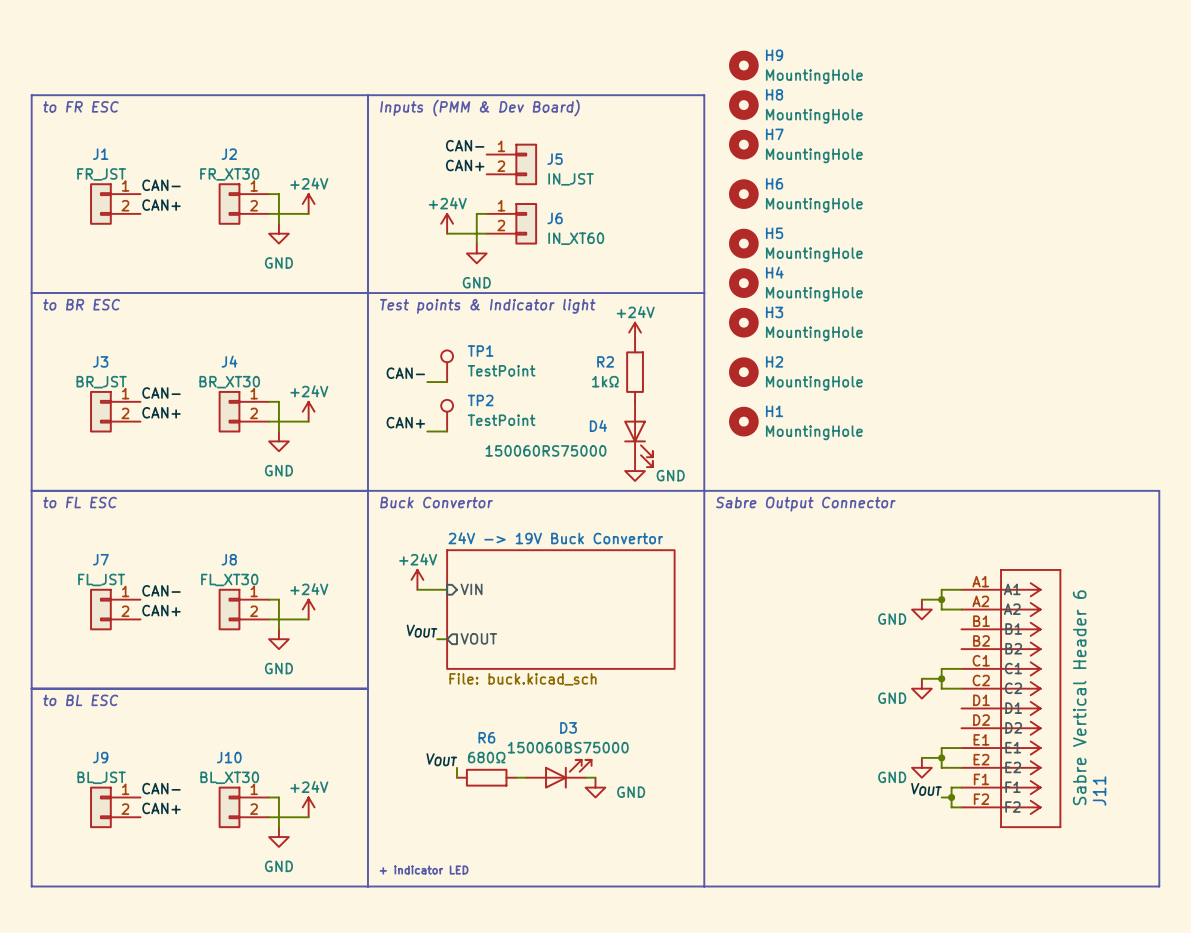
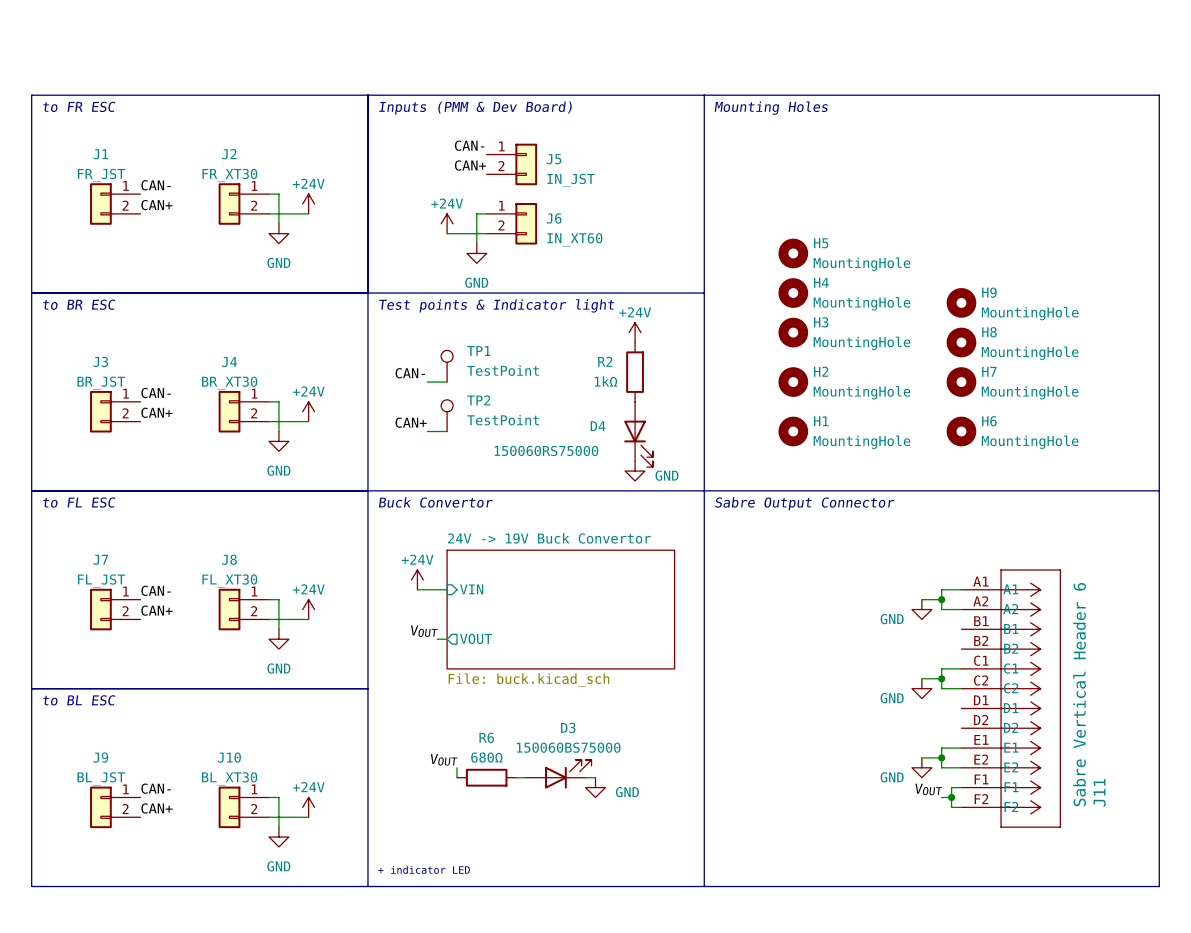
H9 position: (743, 65) -> (961, 302)
line: none -> (704, 95) (1159, 95) (1159, 490)
H8 position: (743, 105) -> (961, 342)
text: none -> Mounting Holes (771, 108)
H7 position: (743, 144) -> (961, 382)
H6 position: (743, 194) -> (961, 431)
H5 position: (743, 243) -> (793, 253)
H4 position: (743, 283) -> (793, 293)
H3 position: (743, 322) -> (793, 332)
H2 position: (743, 372) -> (793, 382)
H1 position: (743, 421) -> (793, 431)

